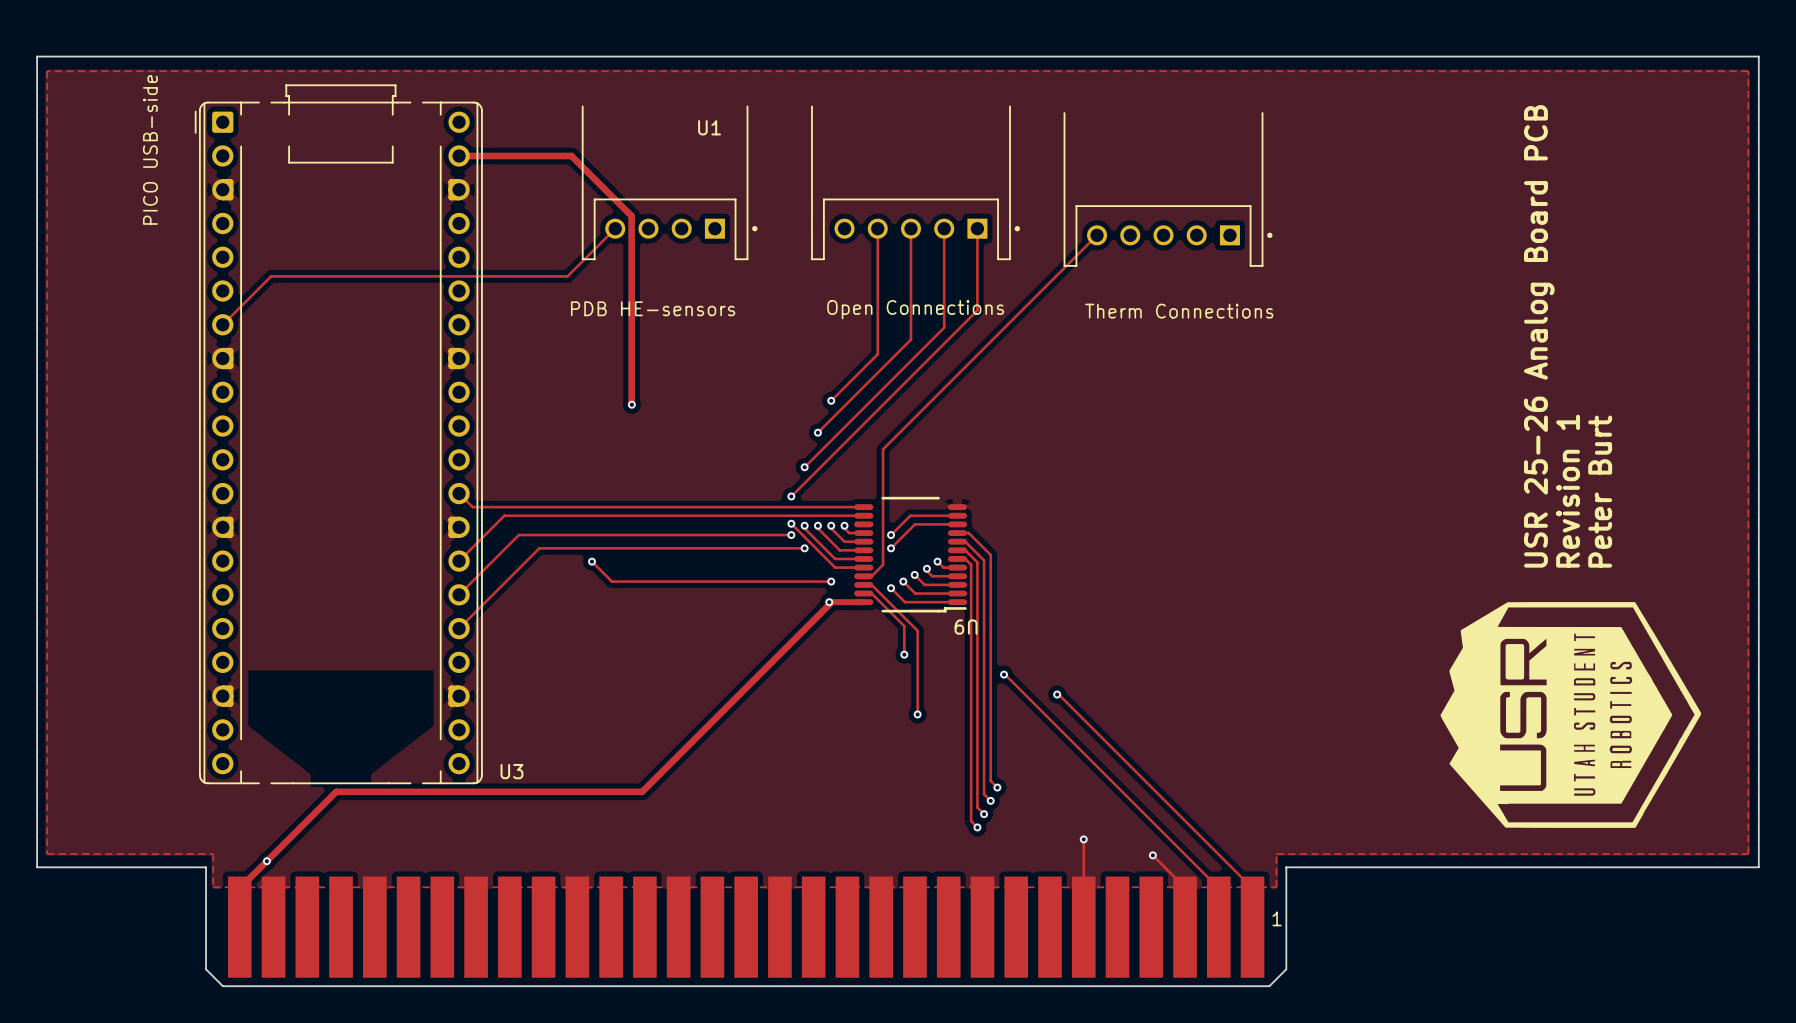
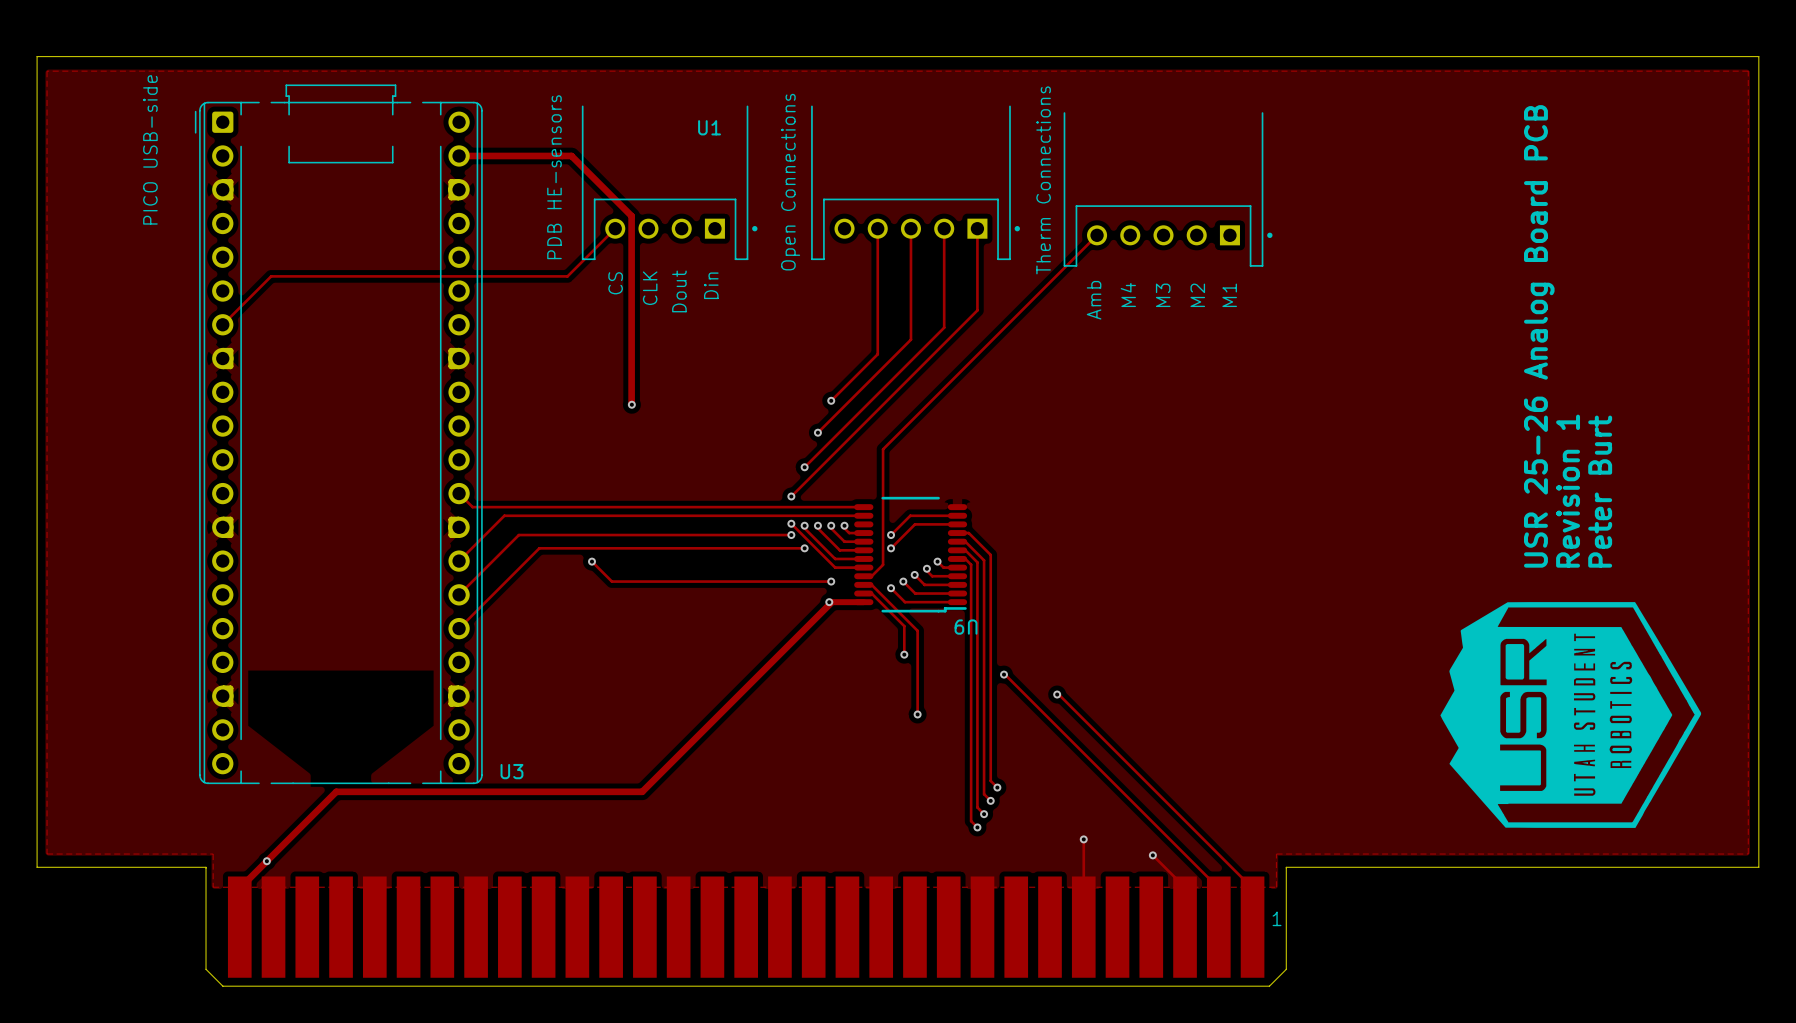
text: none -> CS (615, 283)
text: none -> Din (711, 285)
text: none -> CLK (650, 288)
text: none -> Dout (679, 291)
text: none -> M4 (1128, 294)
text: none -> M3 (1163, 295)
text: none -> M2 (1197, 295)
text: none -> M1 (1229, 295)
text: none -> Amb (1094, 300)
text rotation: 0° (653, 308) -> 90° counterclockwise (554, 177)
text rotation: 0° (915, 309) -> 90° counterclockwise (790, 182)
text rotation: 0° (1179, 311) -> 90° counterclockwise (1043, 180)

